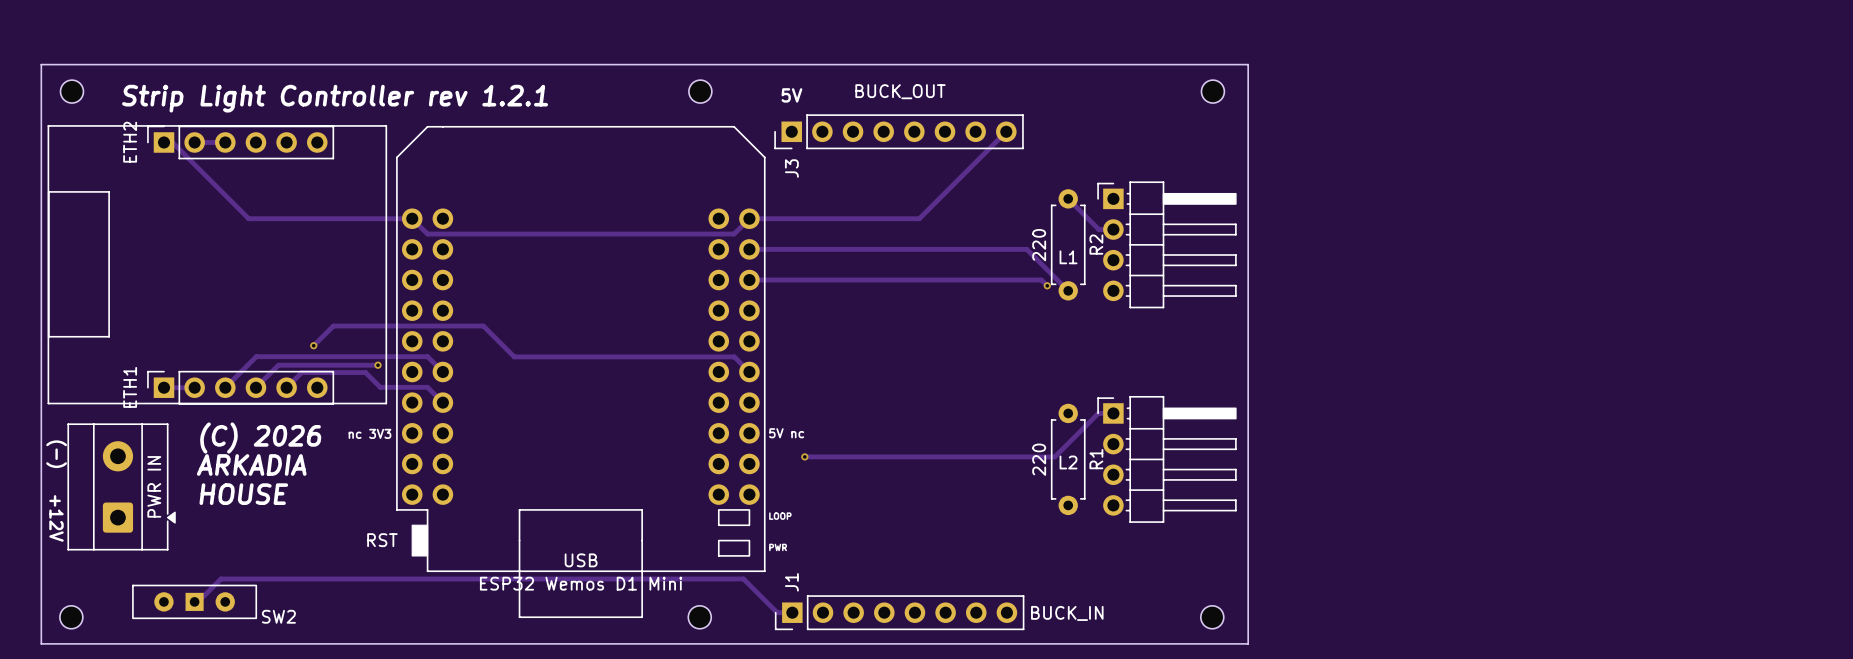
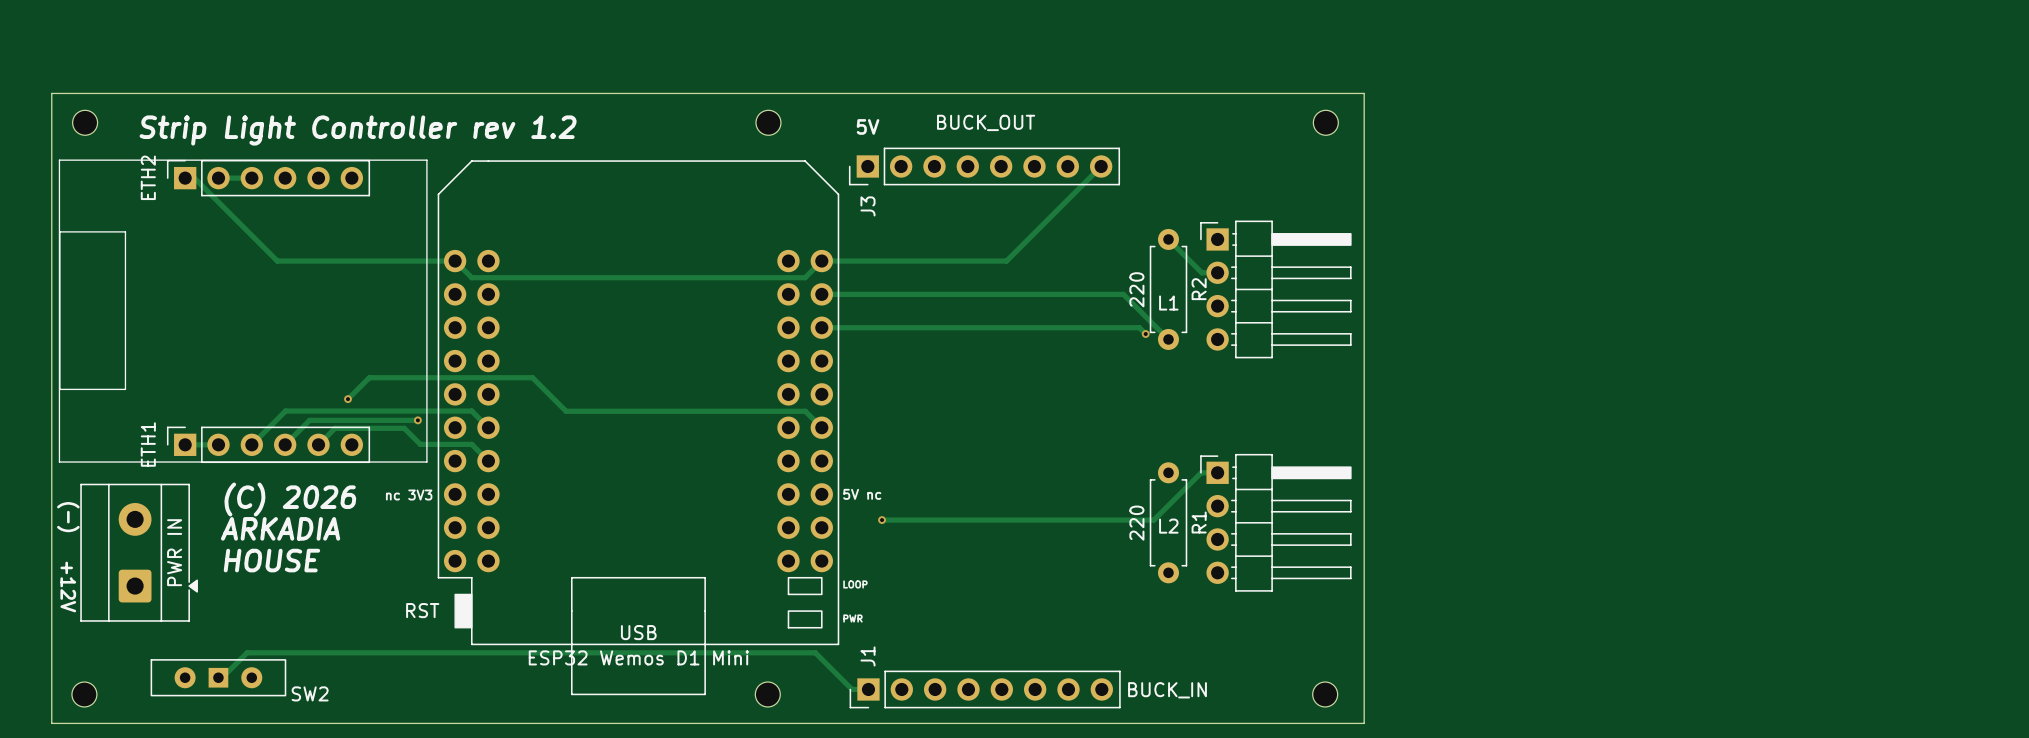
text: Strip Light Controller rev 1.2.1 (335, 98) -> Strip Light Controller rev 1.2 (358, 130)

